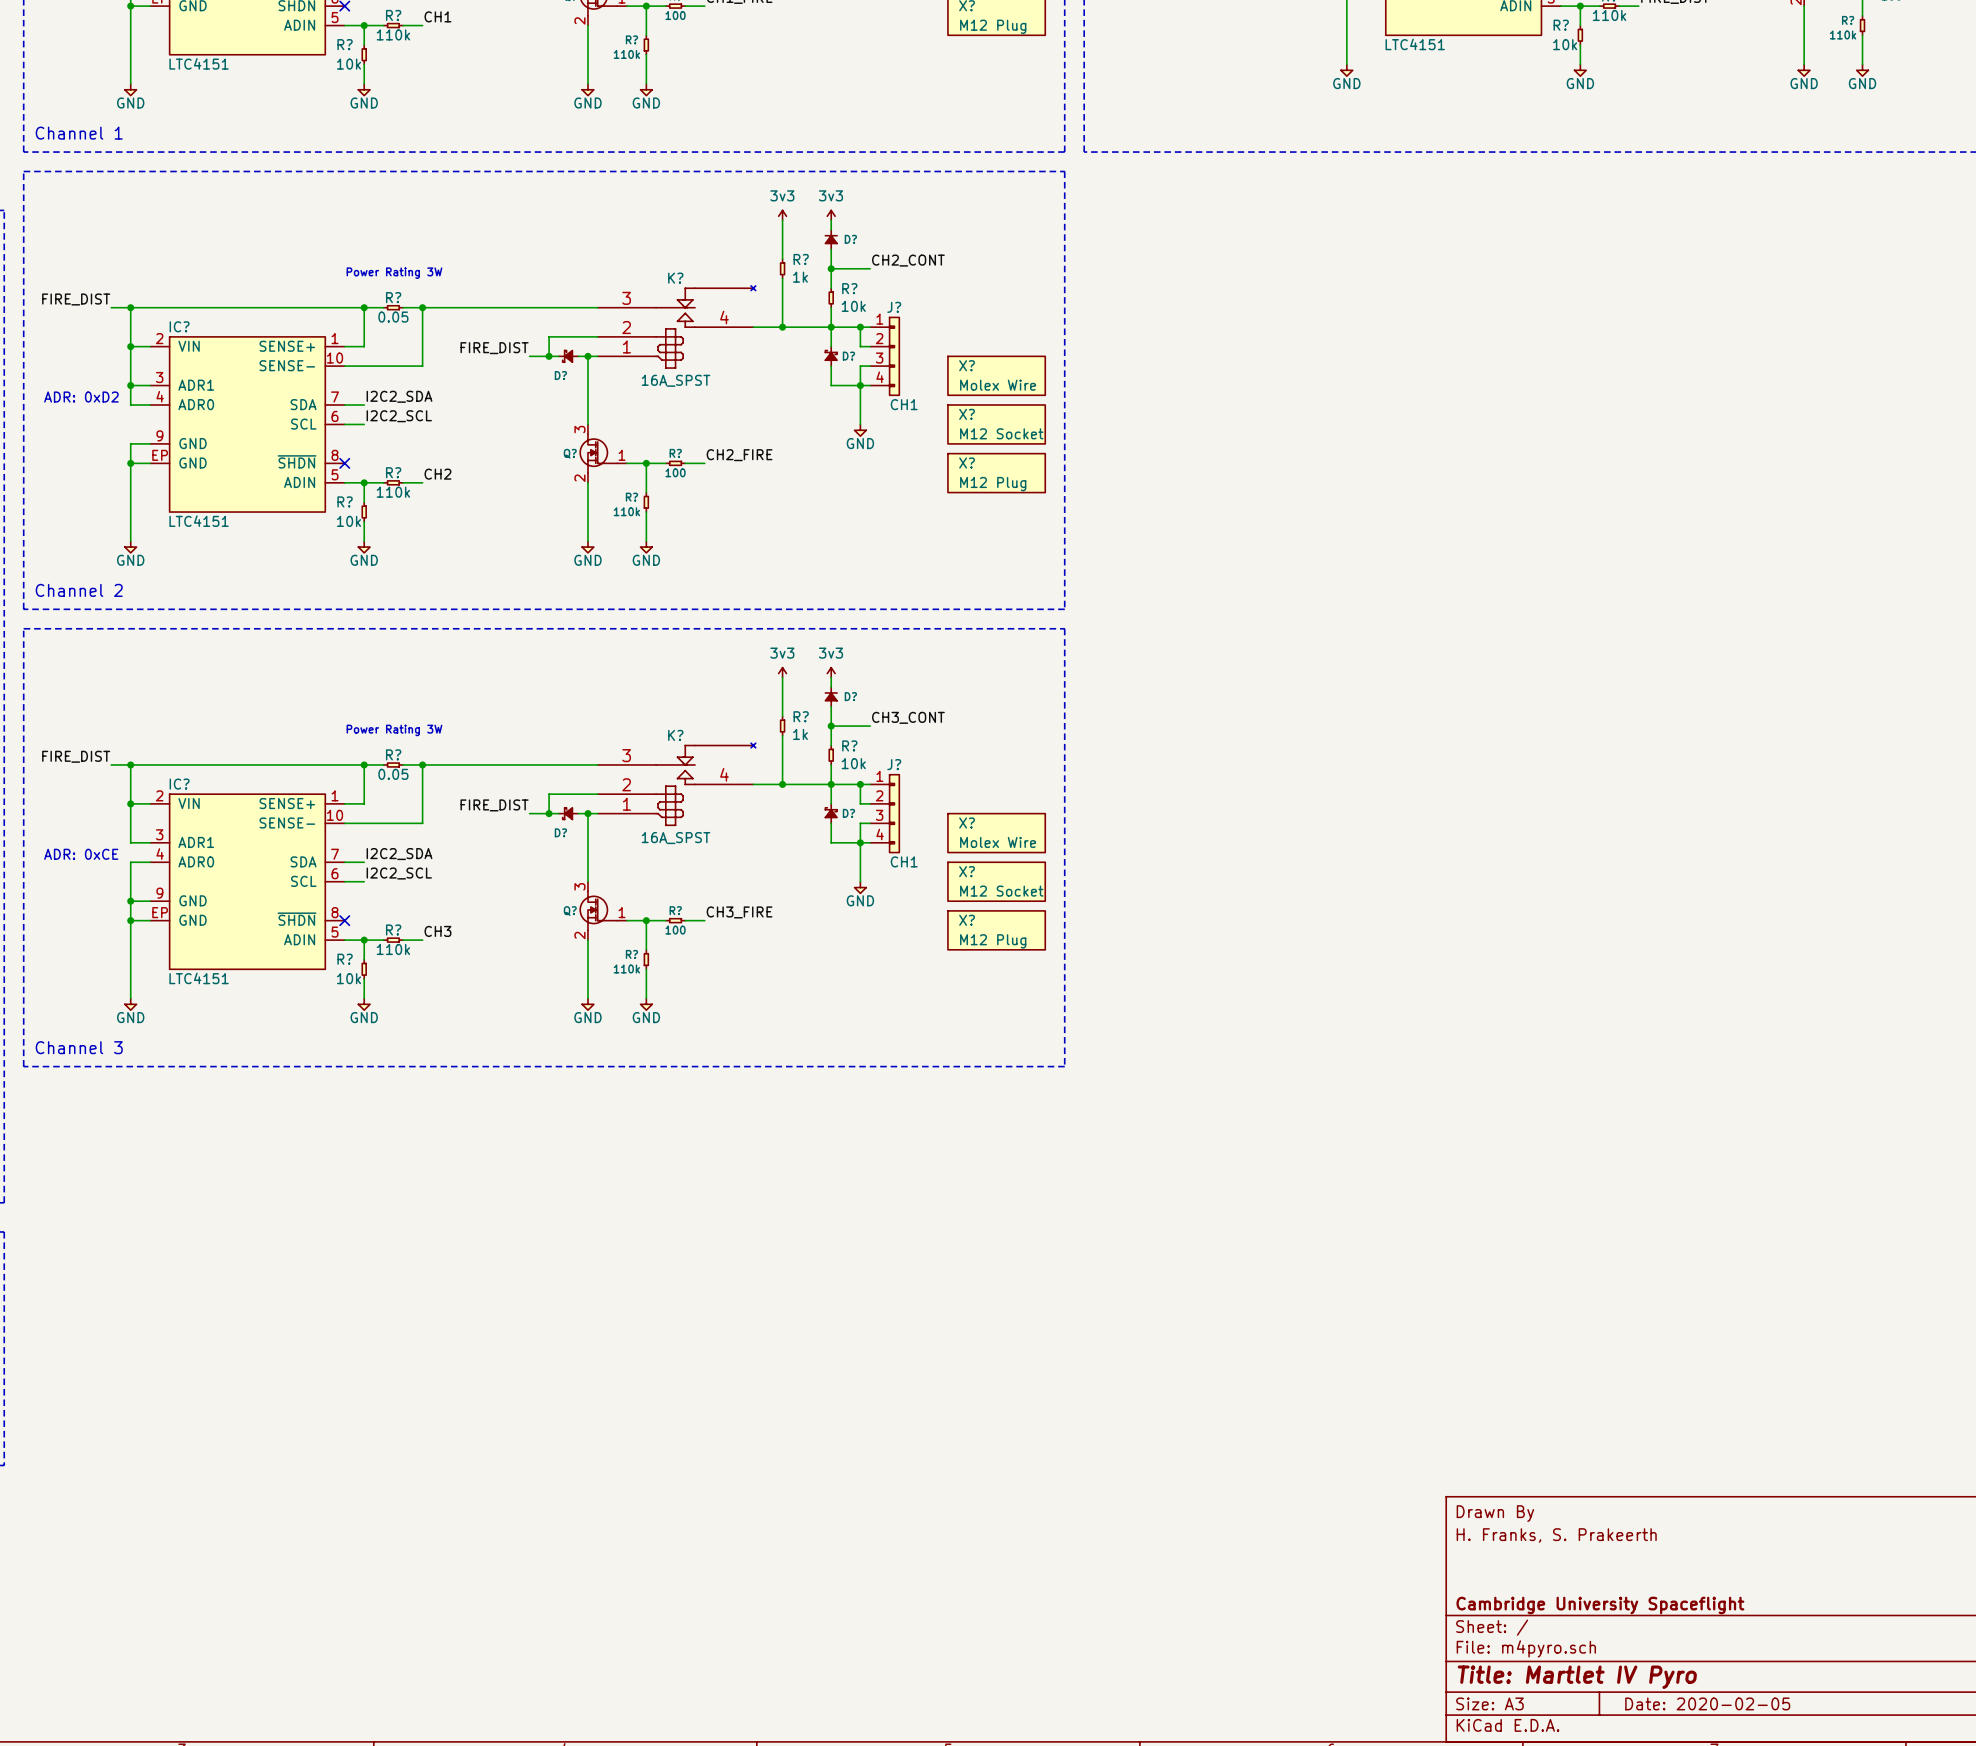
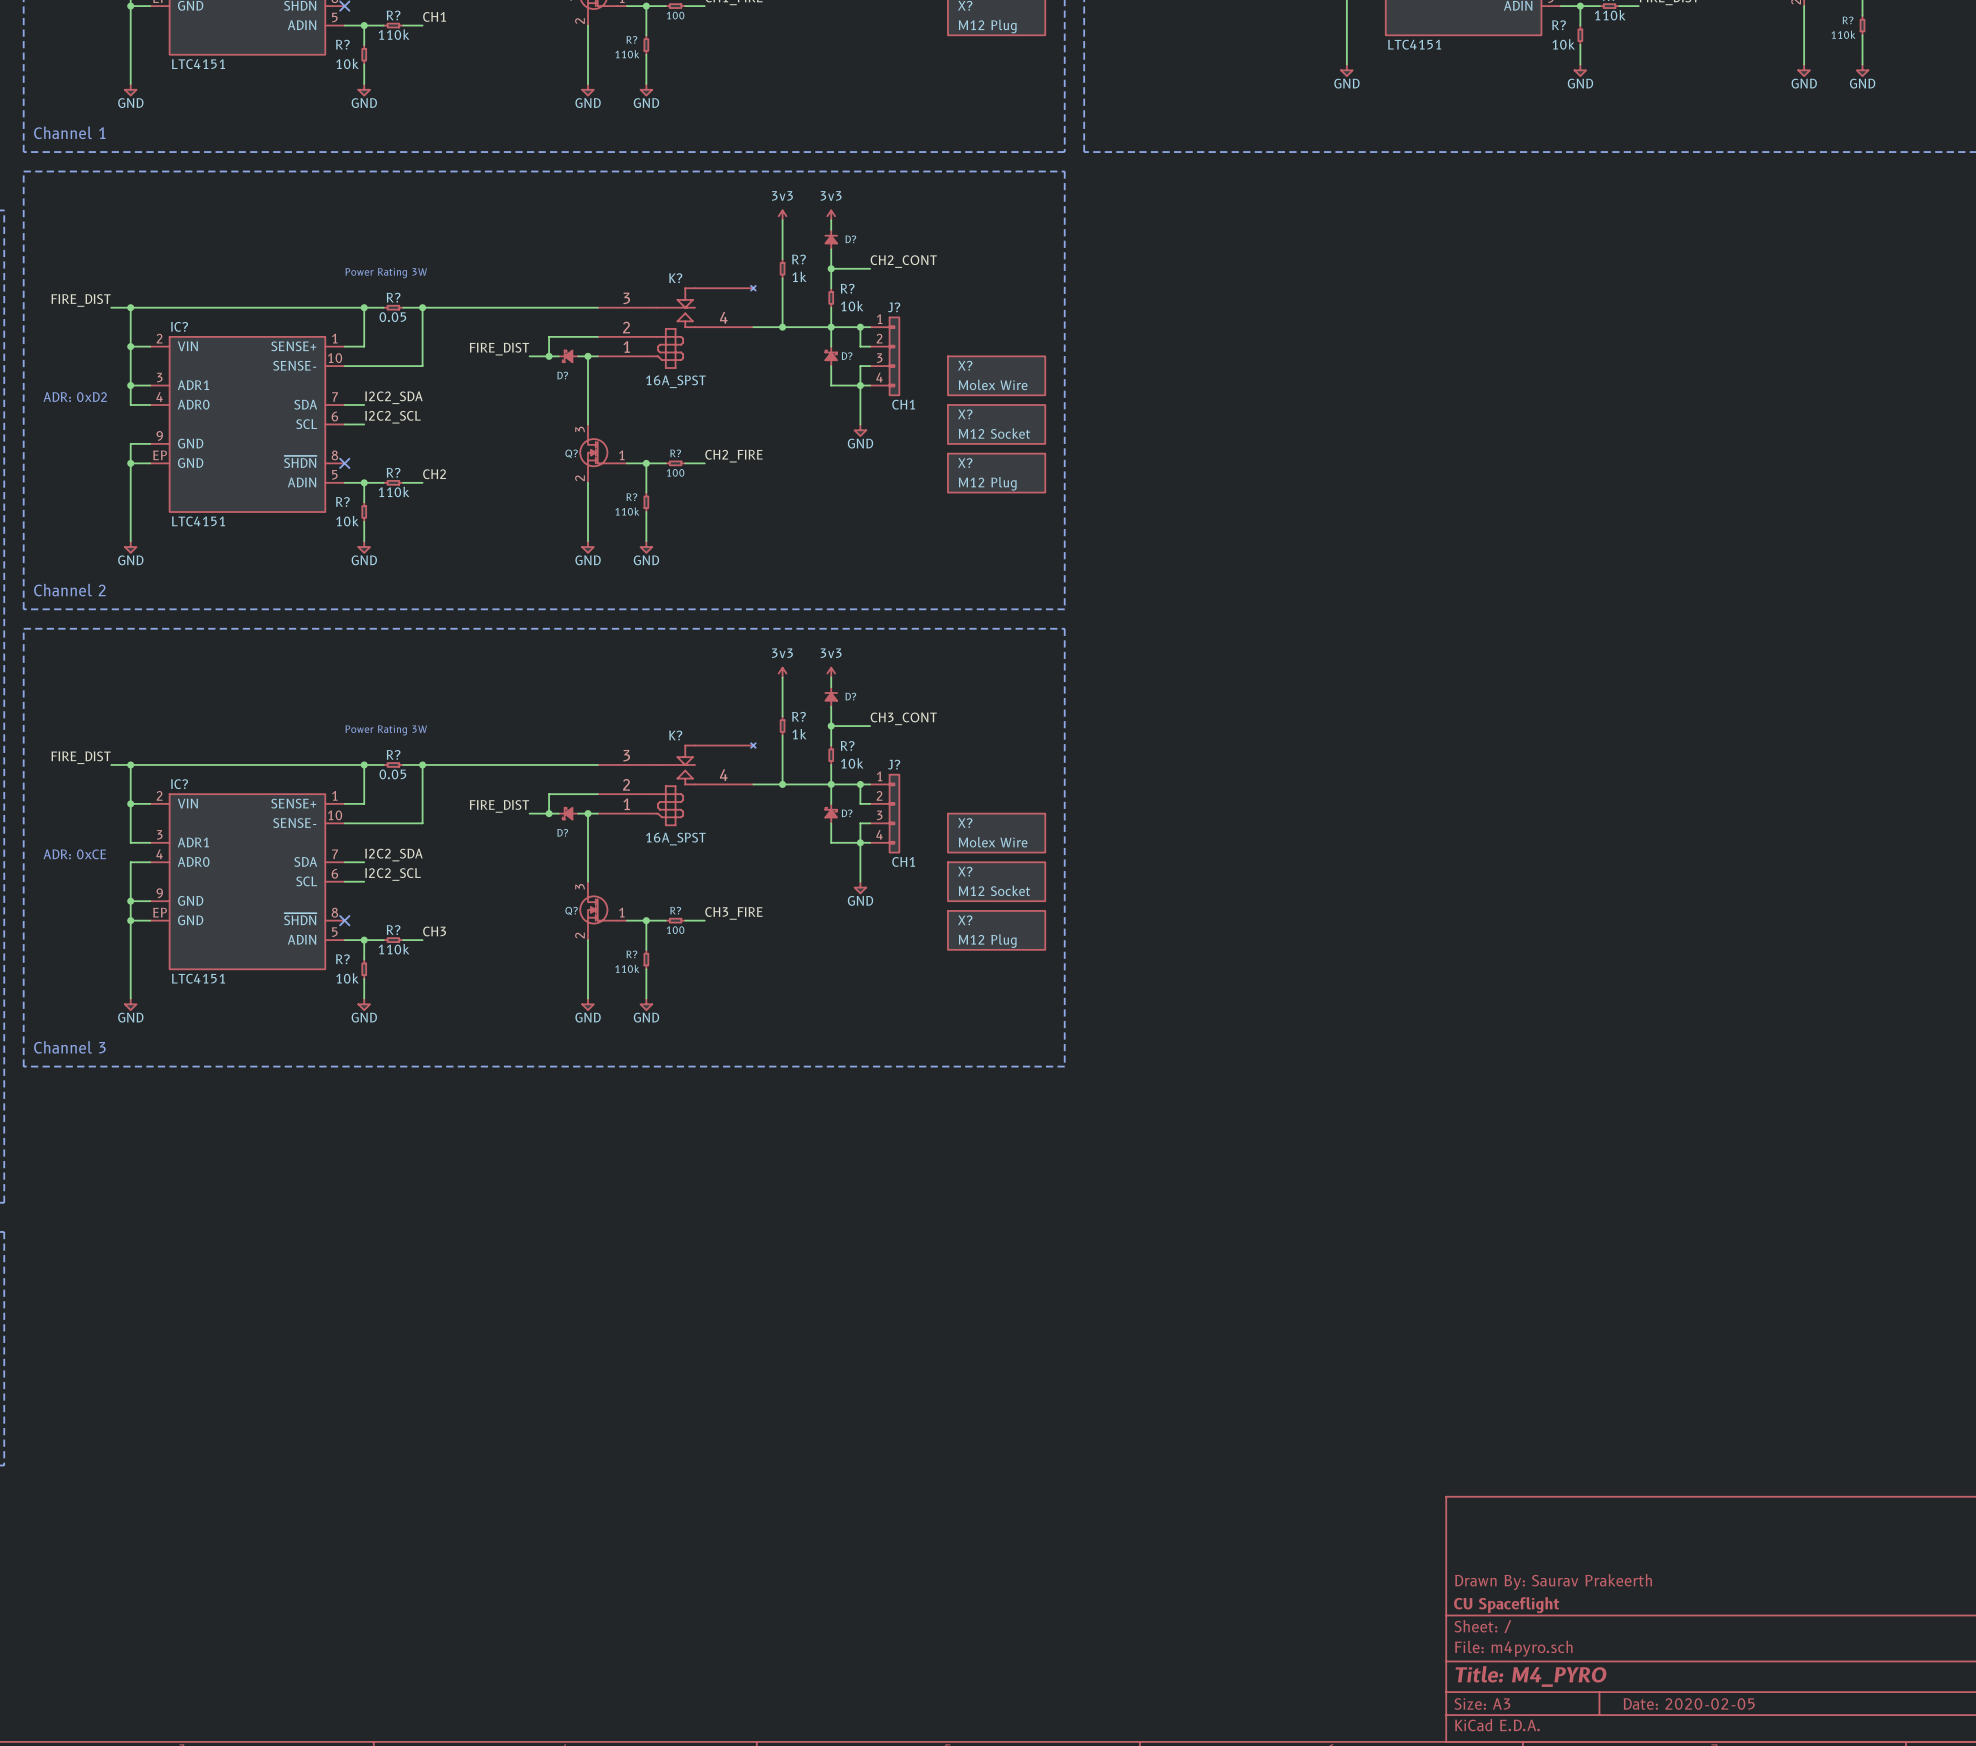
title block: Drawn By (1495, 1513) -> none
title block: H. Franks, S. Prakeerth (1556, 1535) -> none
title block: none -> Drawn By: Saurav Prakeerth (1553, 1582)
title block: Cambridge University Spaceflight (1600, 1605) -> CU Spaceflight (1506, 1605)
title block: Title: Martlet IV Pyro (1577, 1677) -> Title: M4_PYRO (1531, 1676)

